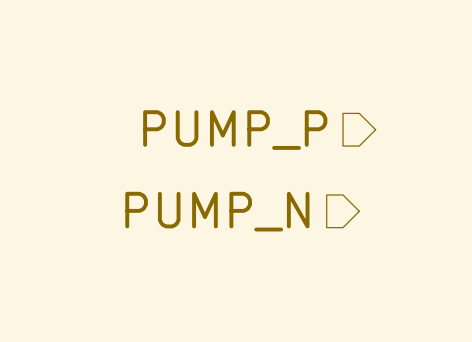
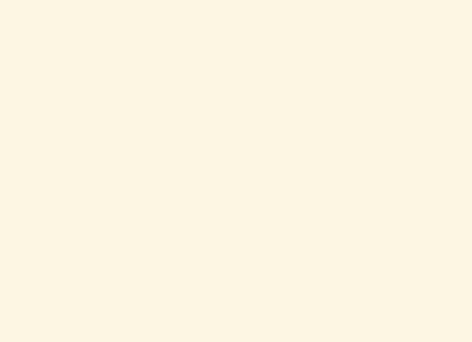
hierarchical label: PUMP_P (235, 130) -> none
hierarchical label: PUMP_N (217, 211) -> none

